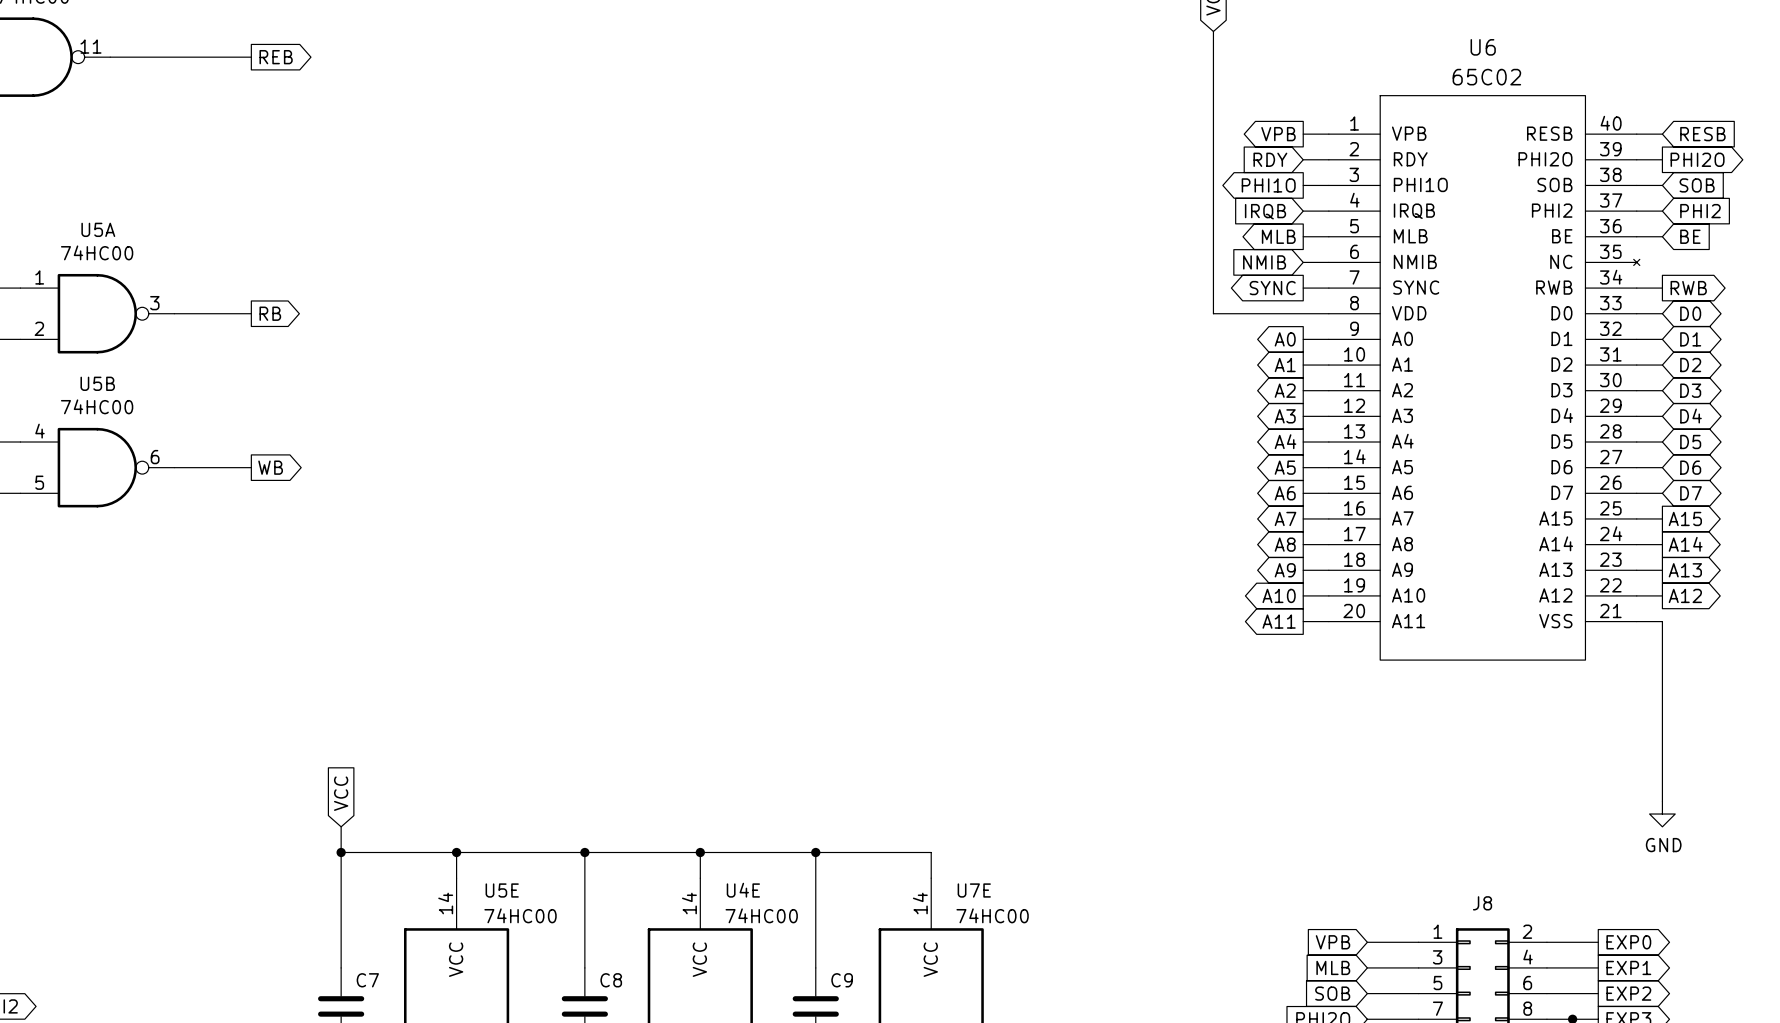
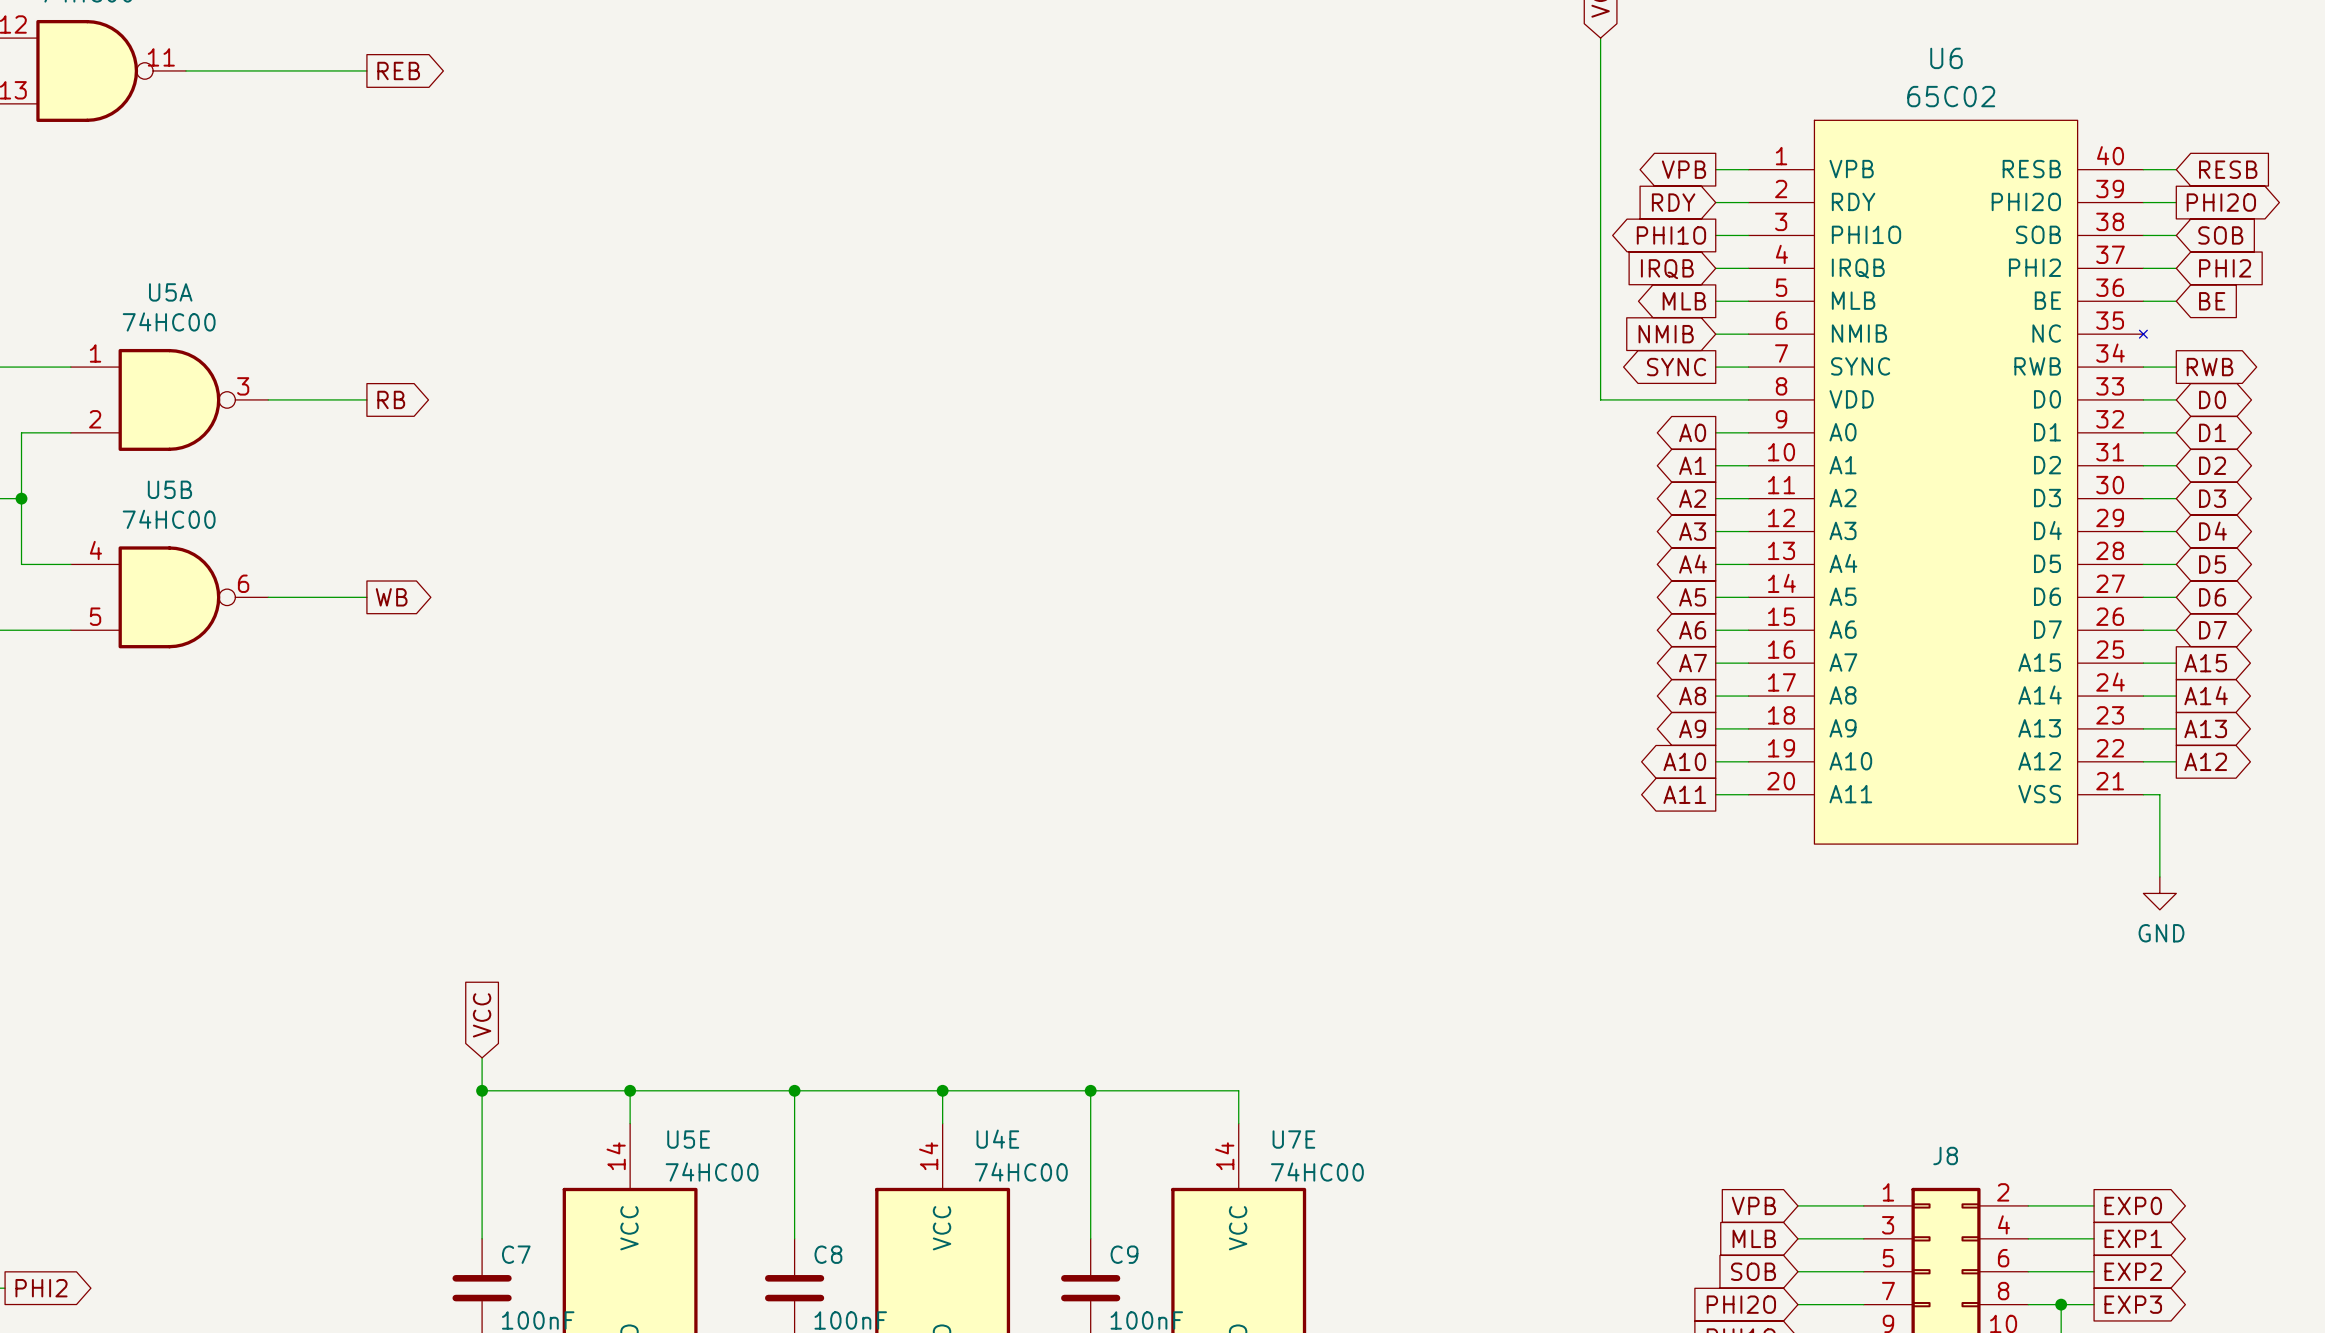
wire: (1649, 621) (1662, 621) (1662, 801) -> (2159, 794) (2159, 876)
power symbol position: GND (1662, 814) -> GND (2159, 893)

